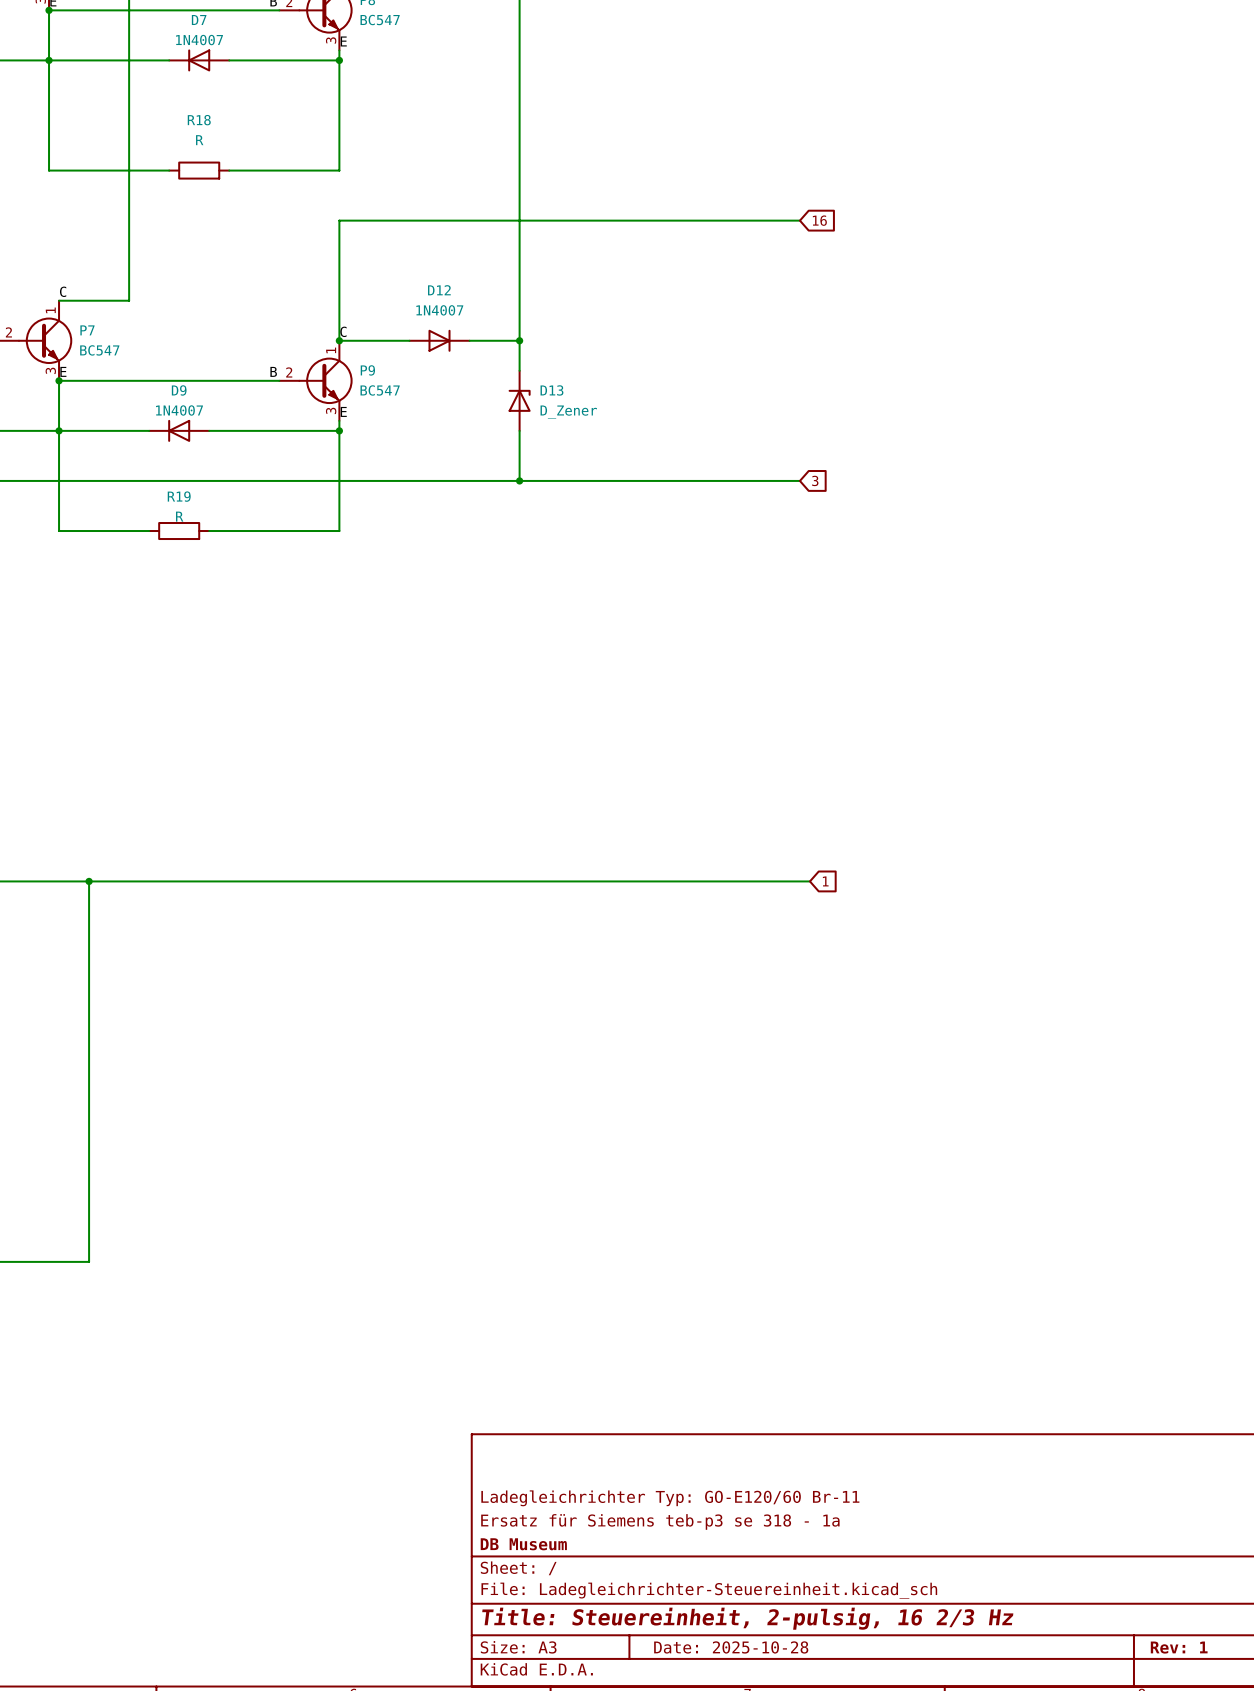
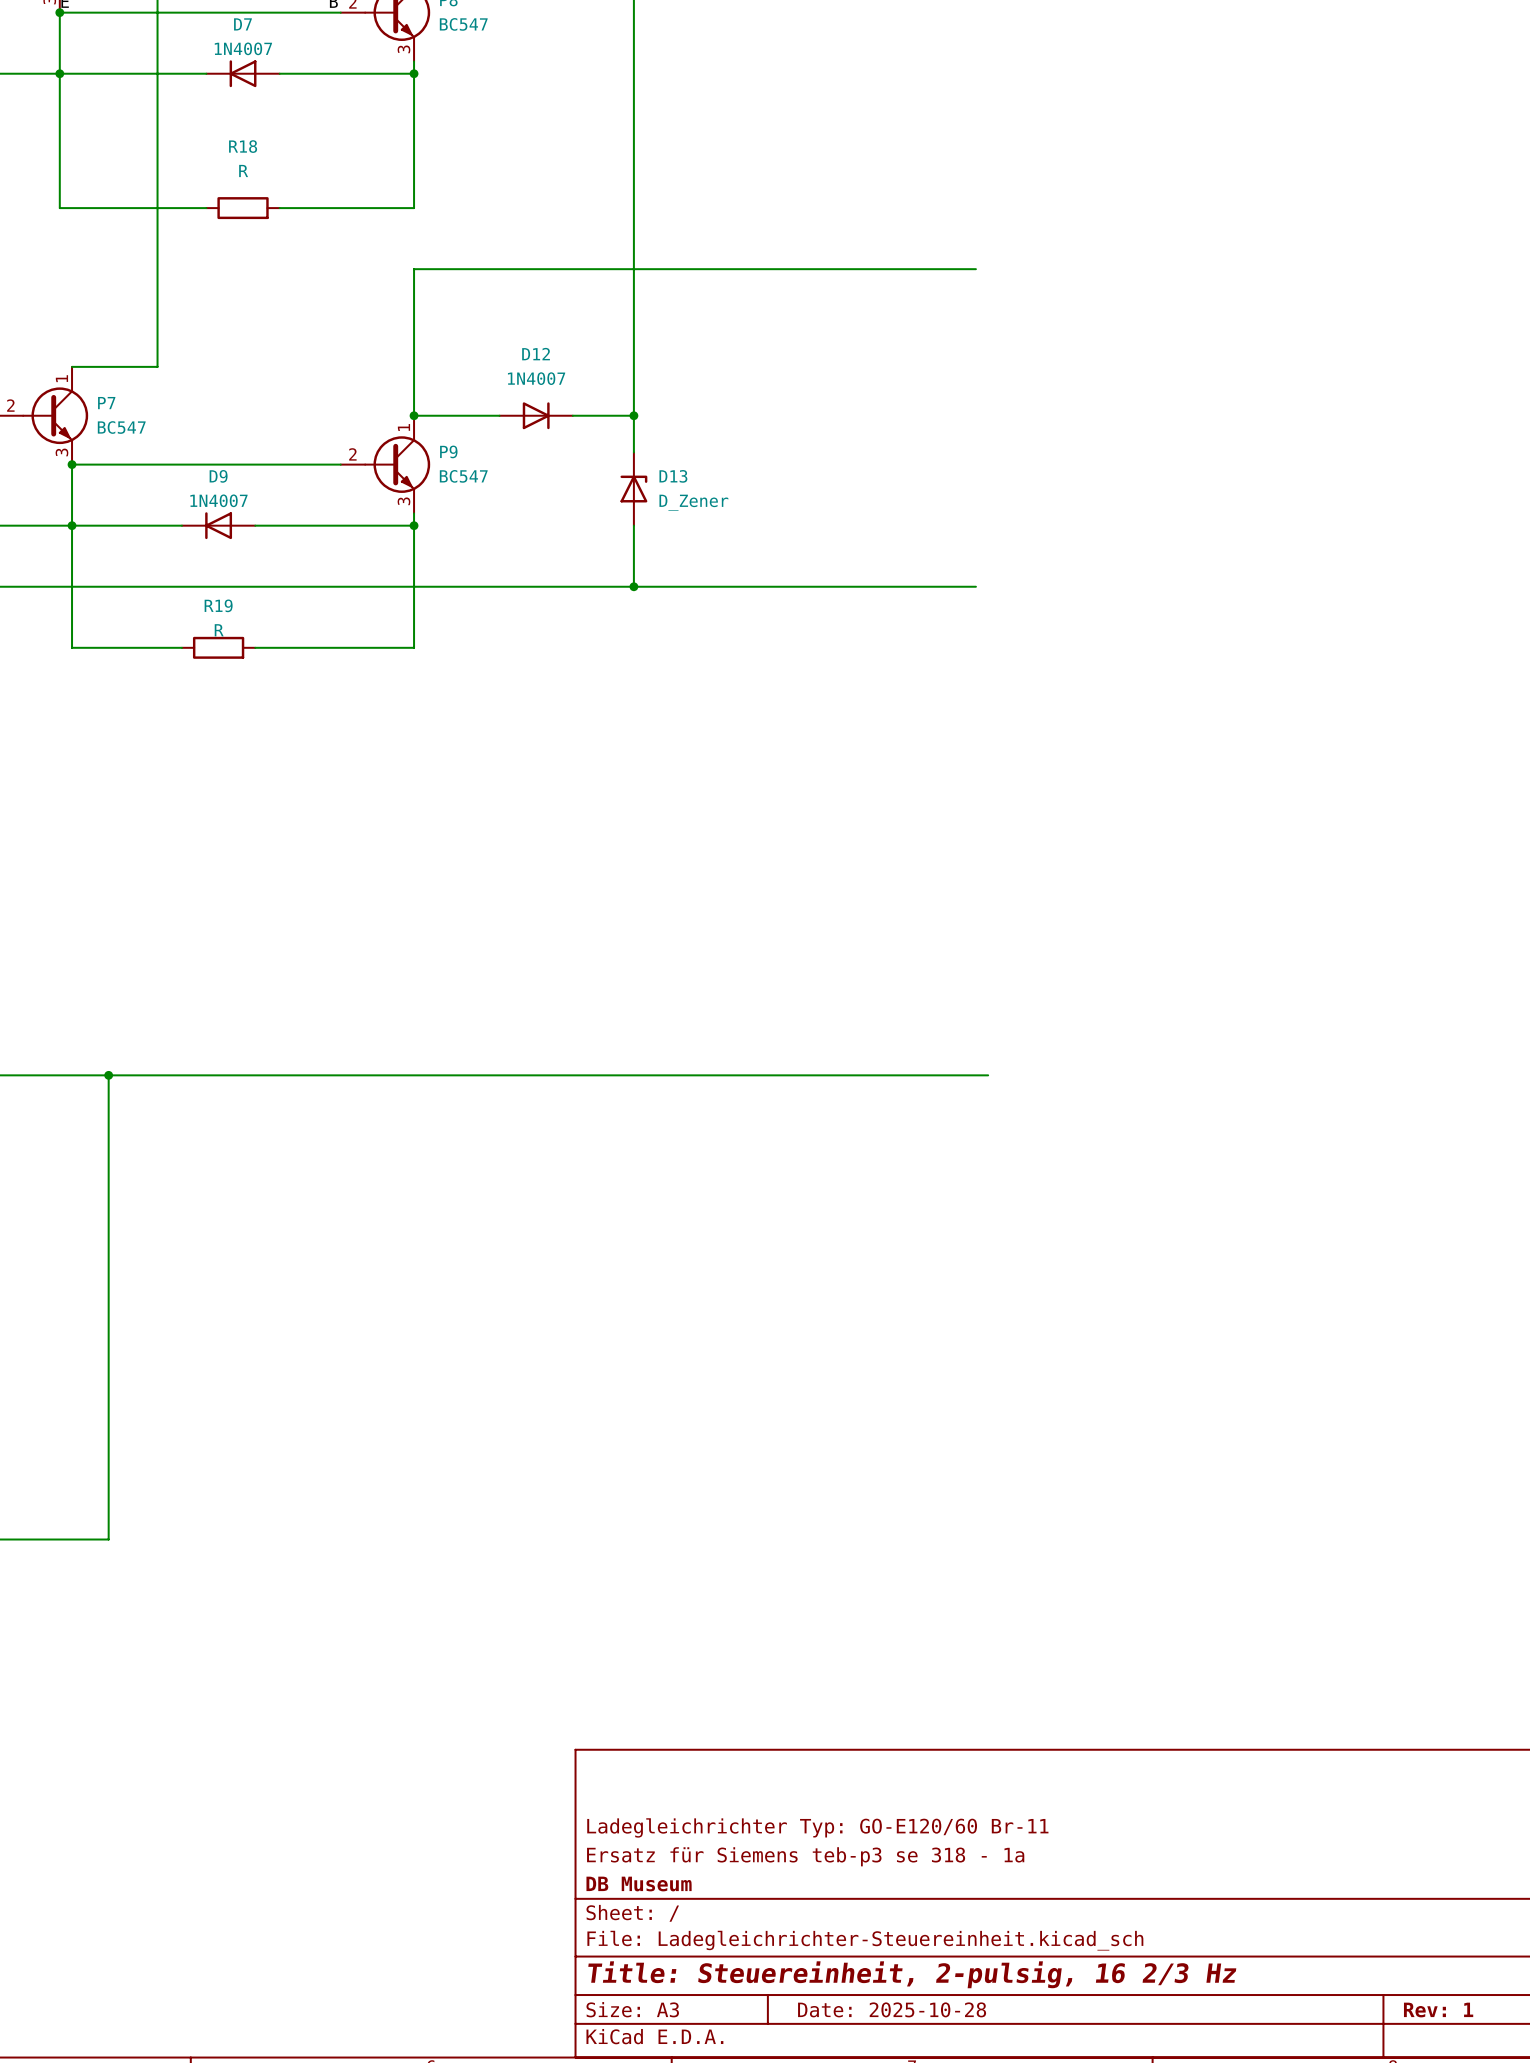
label: E (343, 41) -> none
global label: 16 (819, 220) -> none
label: C (63, 291) -> none
label: C (343, 331) -> none
label: E (63, 371) -> none
label: B (273, 371) -> none
label: E (343, 411) -> none
global label: 3 (815, 480) -> none
global label: 1 (825, 881) -> none

